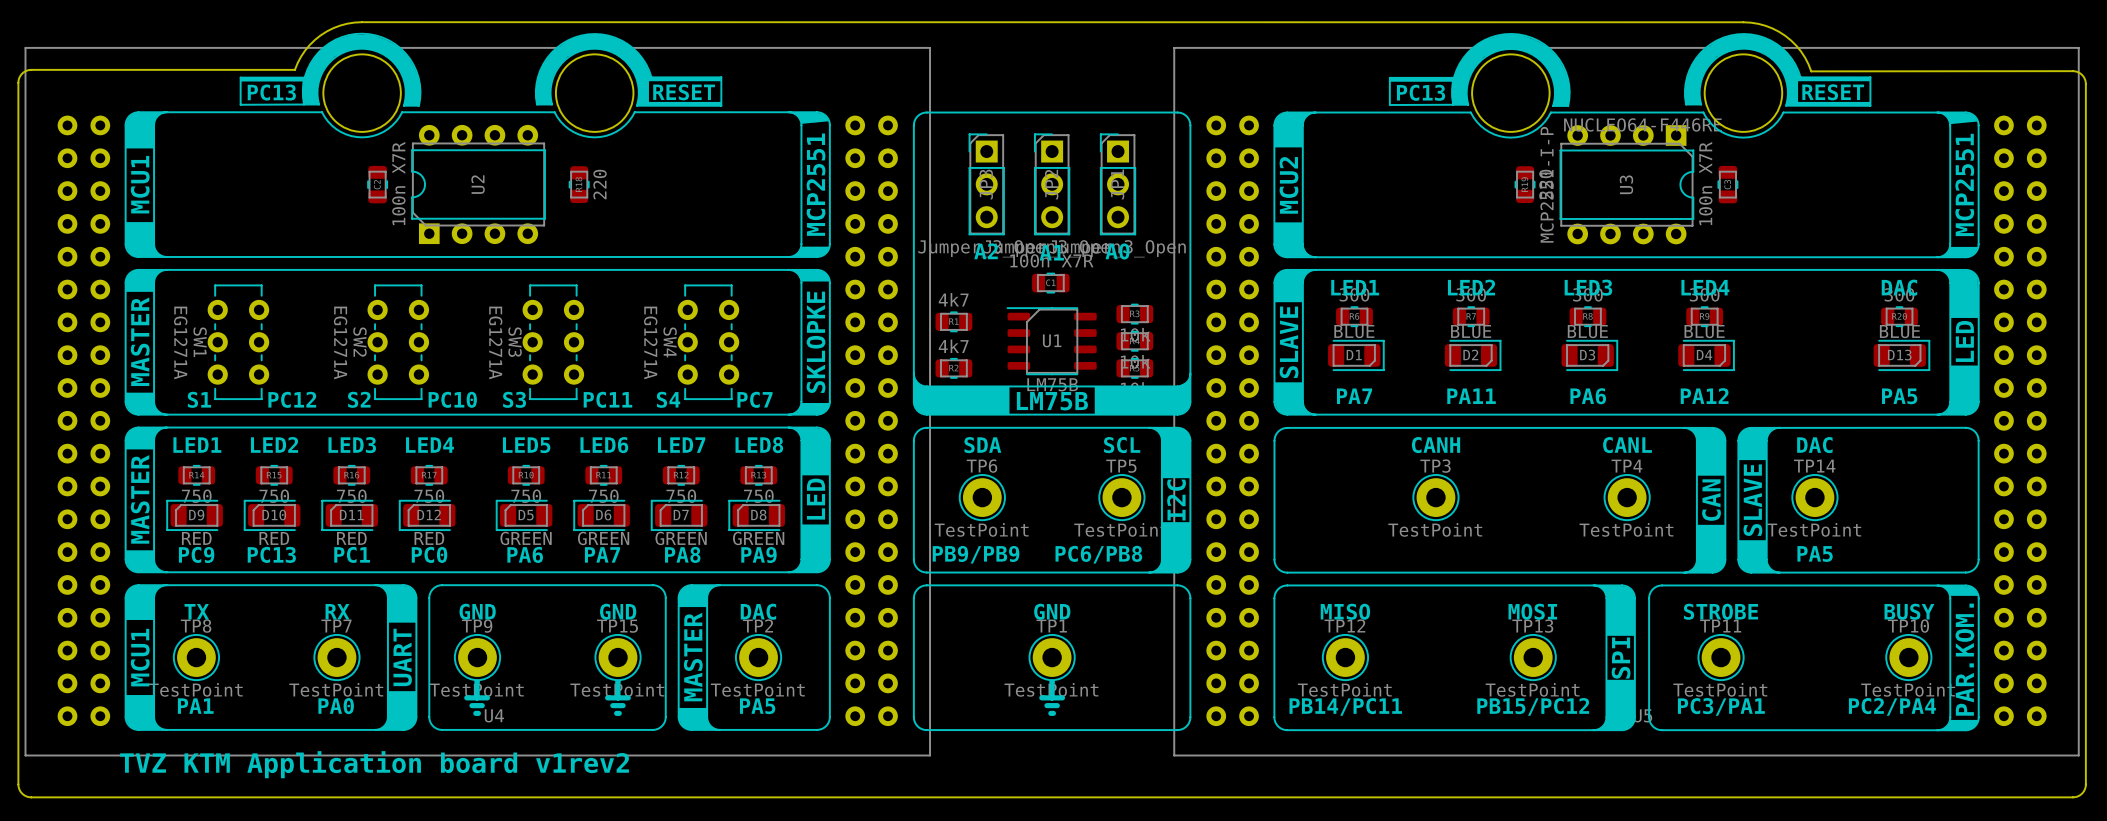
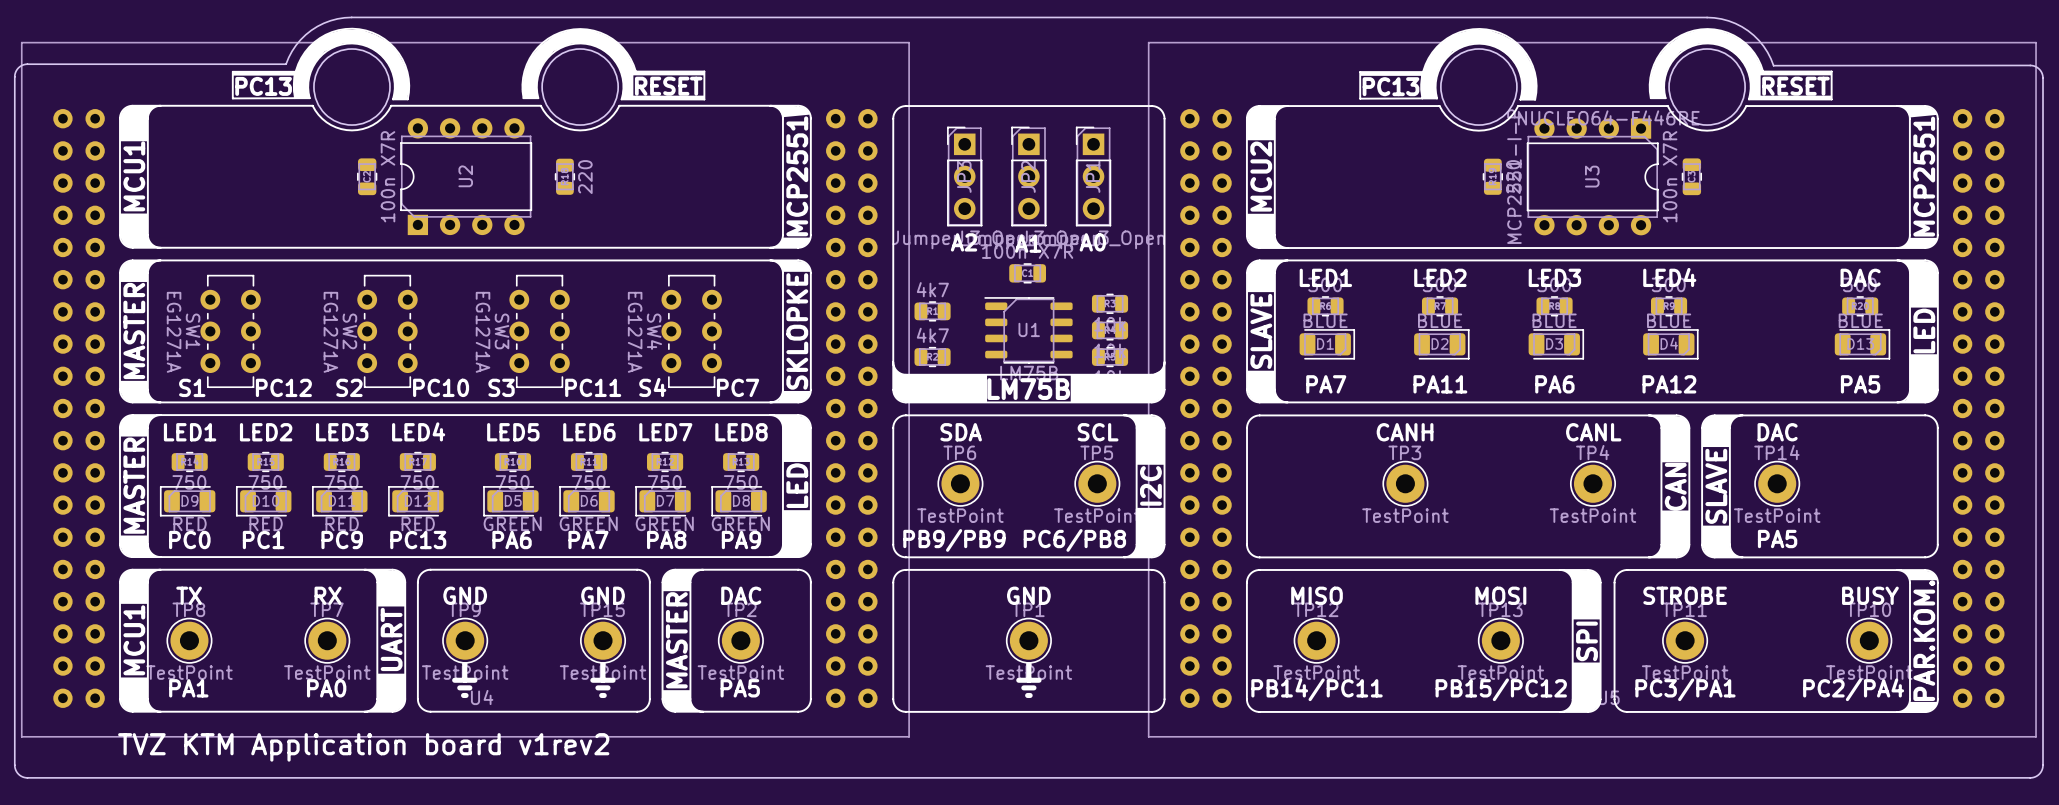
text: PC9 (196, 554) -> PC0 (189, 540)
text: PC13 (271, 554) -> PC1 (263, 540)
text: PC1 (352, 554) -> PC9 (342, 540)
text: PC0 (429, 554) -> PC13 (418, 540)

